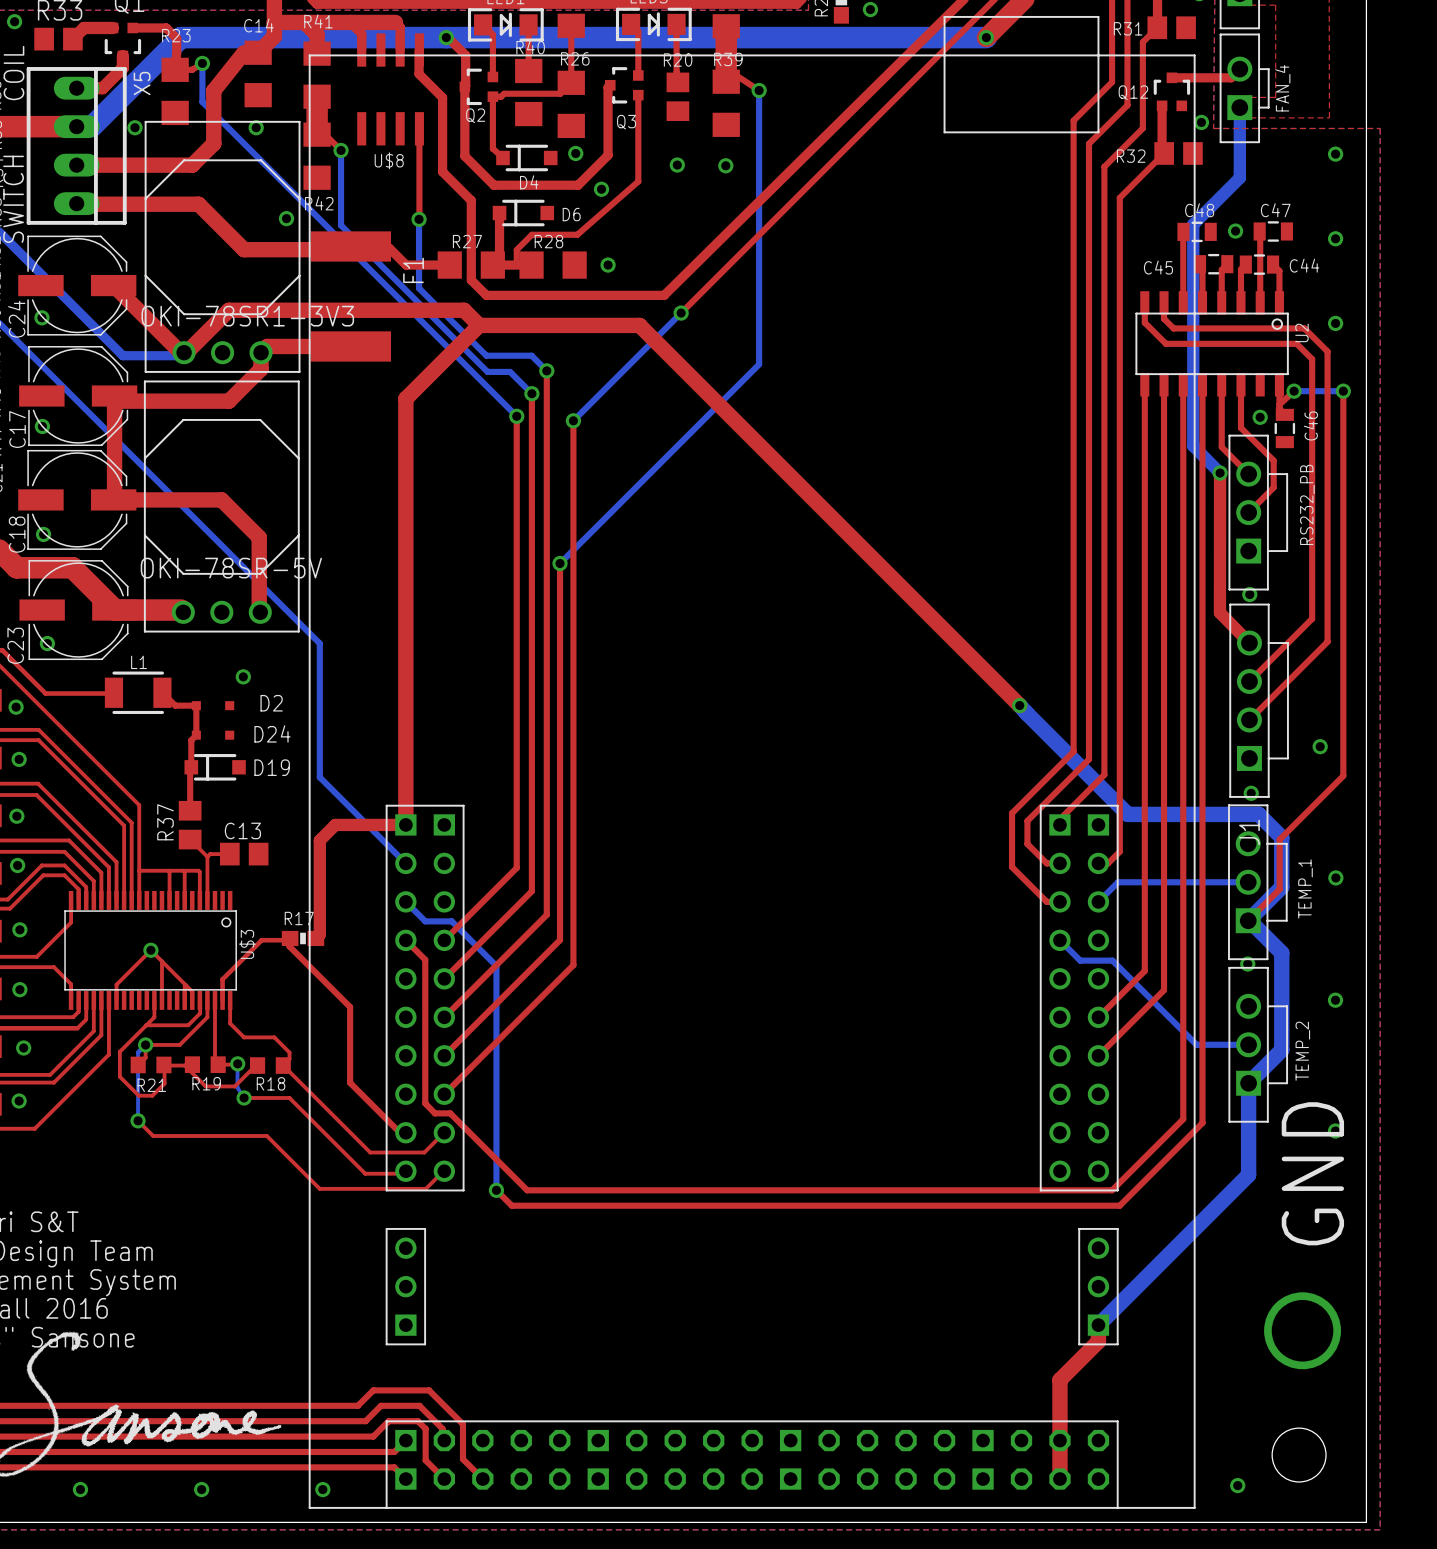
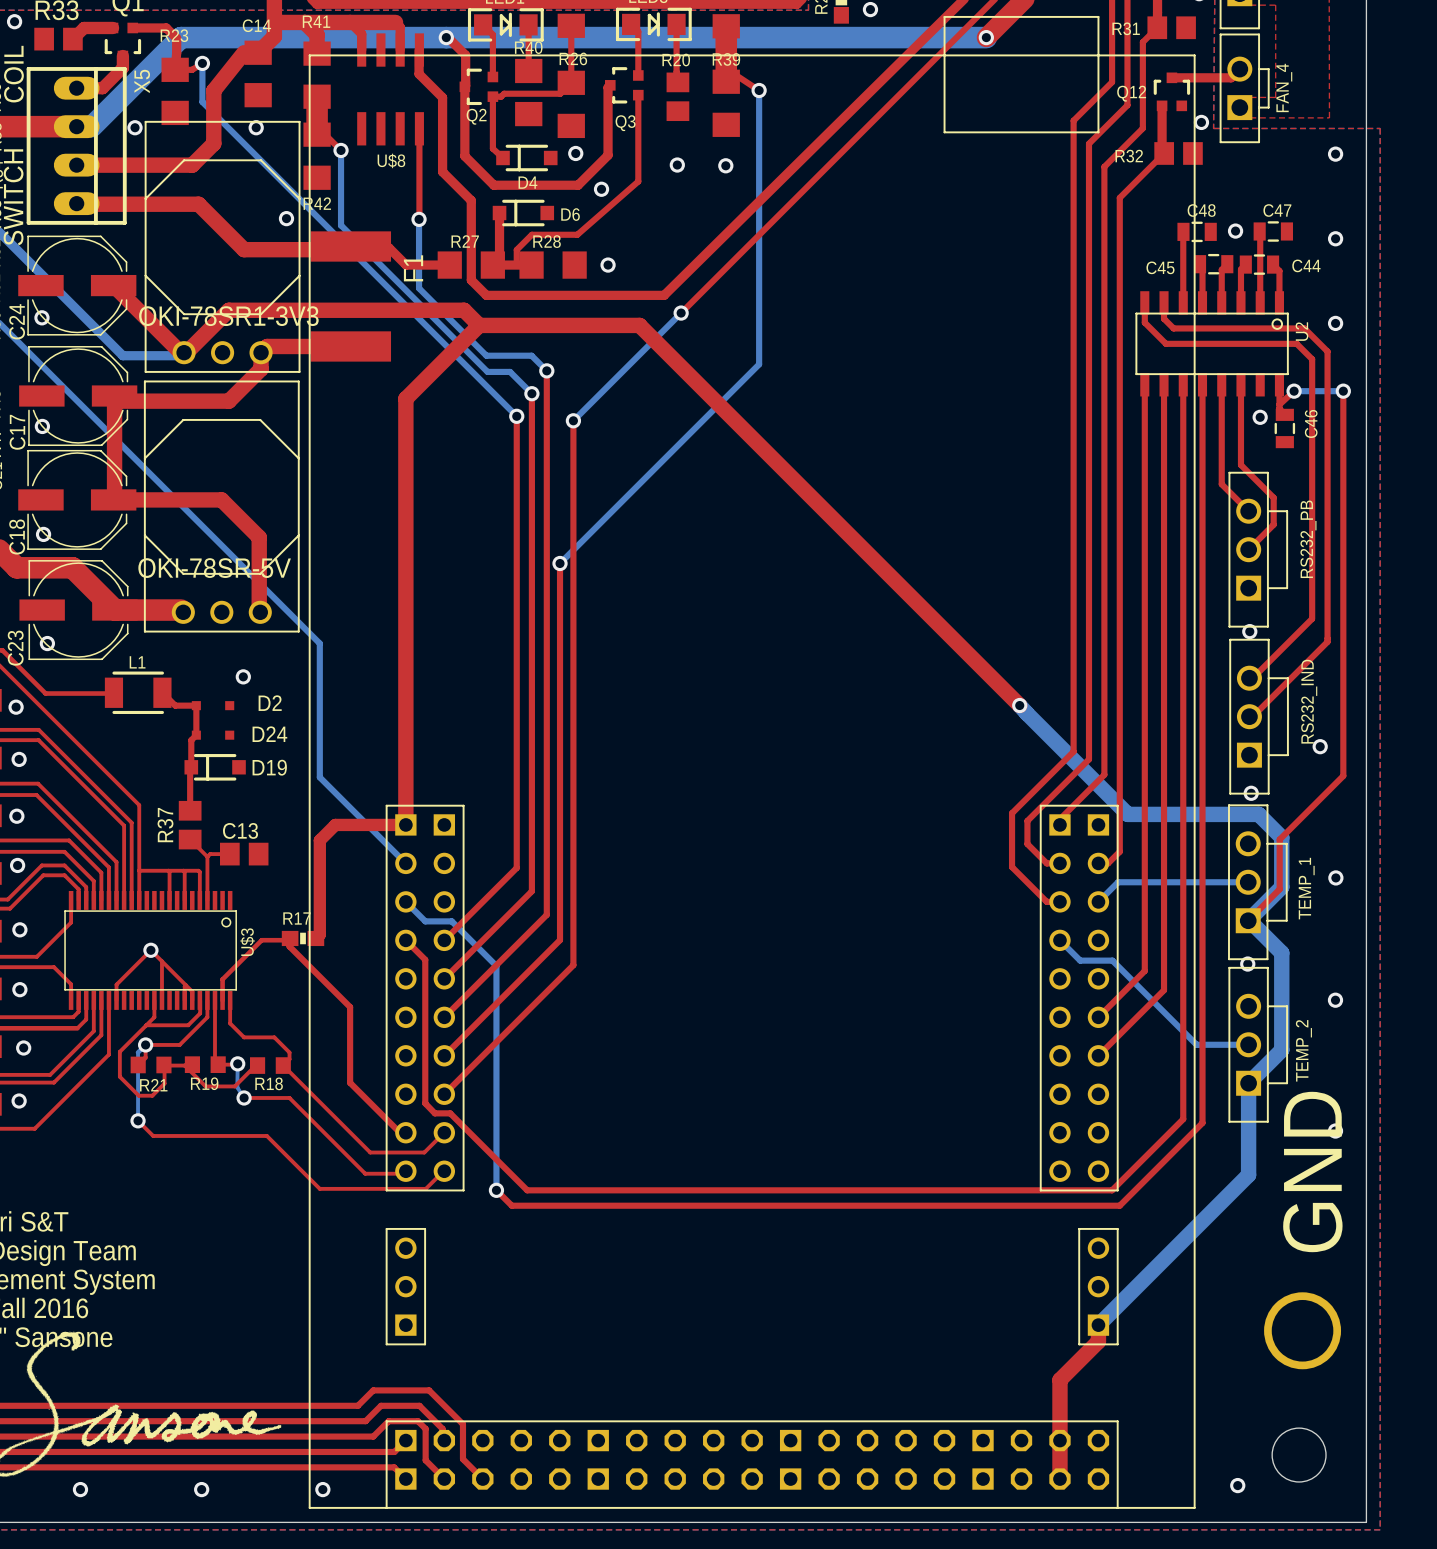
bottom track: (1239, 107) (1239, 177) (1193, 224) (1193, 445) (1220, 473) -> none
top track: (1240, 427) (1273, 460) (1273, 487) (1248, 512) -> (1240, 427) (1240, 465) (1273, 497) (1273, 524) (1248, 549)
top track: (1221, 447) (1248, 474) -> (1221, 447) (1221, 484) (1248, 511)
top track: (1220, 473) (1219, 612) (1249, 643) -> none
via: (1220, 473) -> none
RS232_PB position: (1258, 512) -> (1258, 549)
via position: (1249, 594) -> (1249, 631)
J1: (1259, 700) -> none
RS232_IND: none -> (1259, 716)

